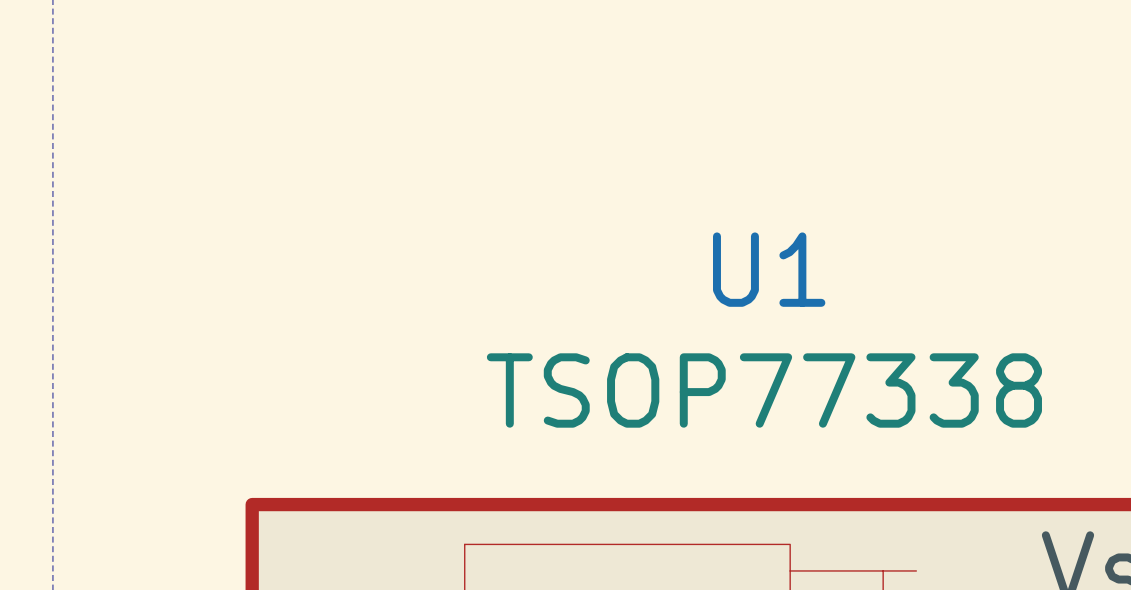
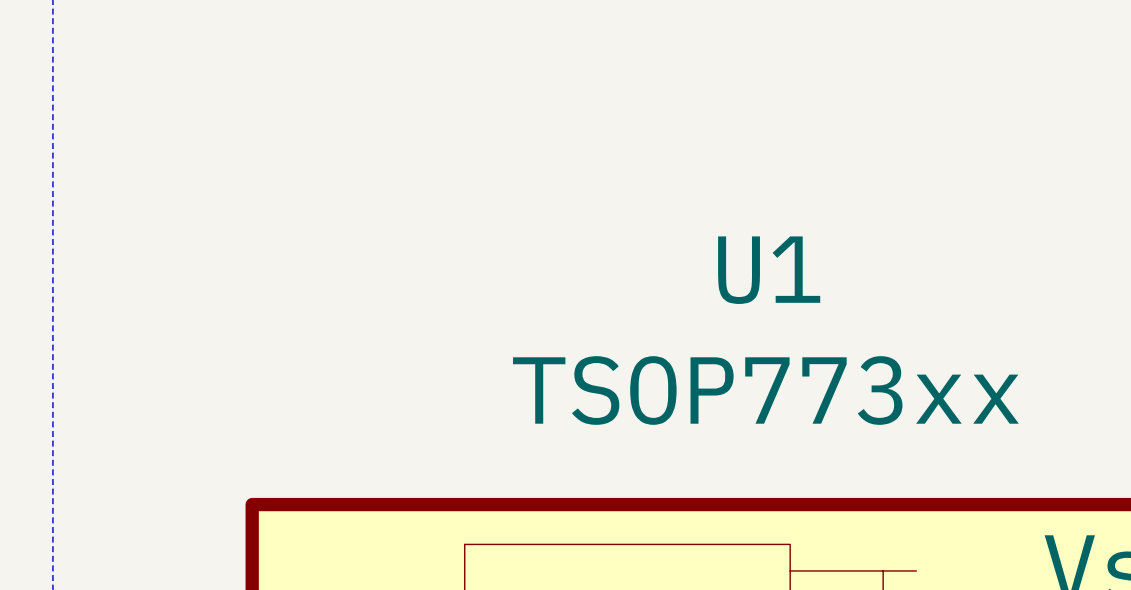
U1 value: TSOP77338 (764, 390) -> TSOP773xx (765, 390)

